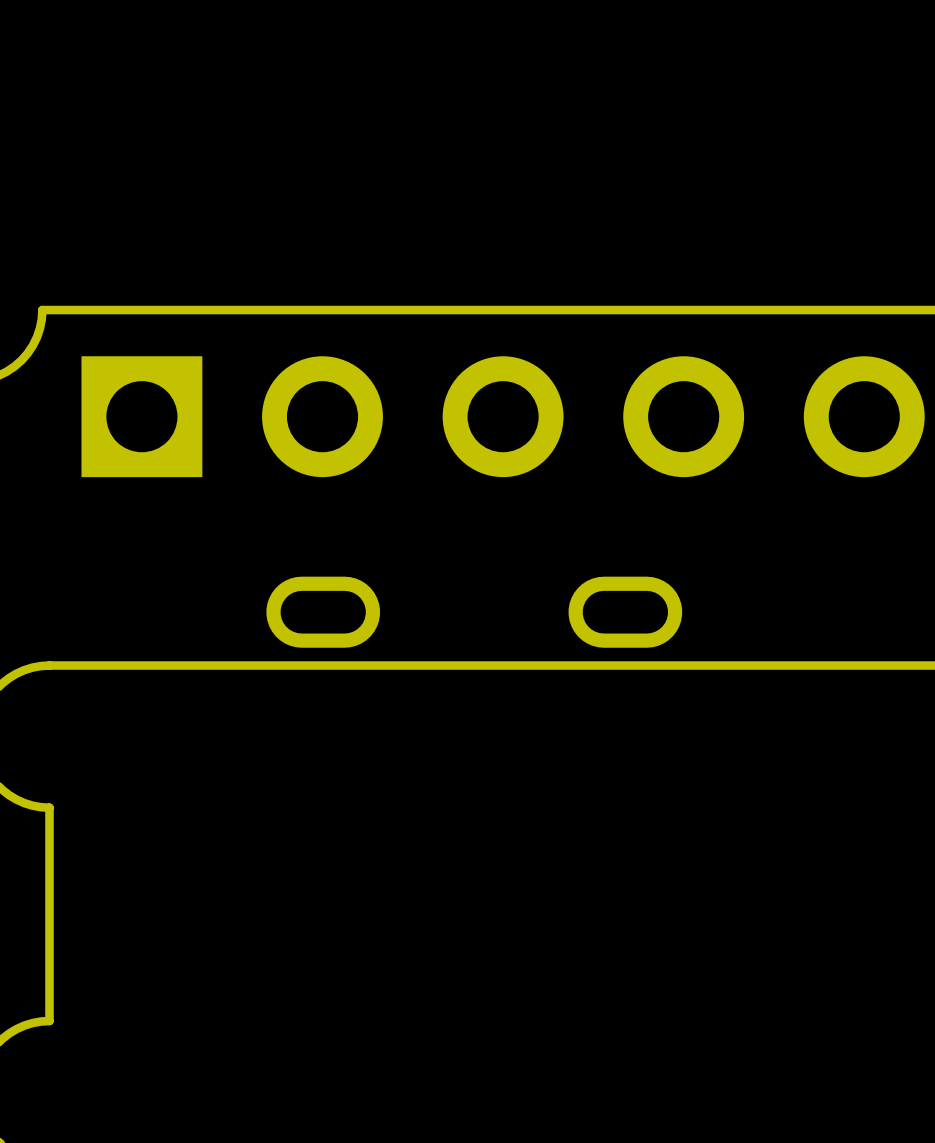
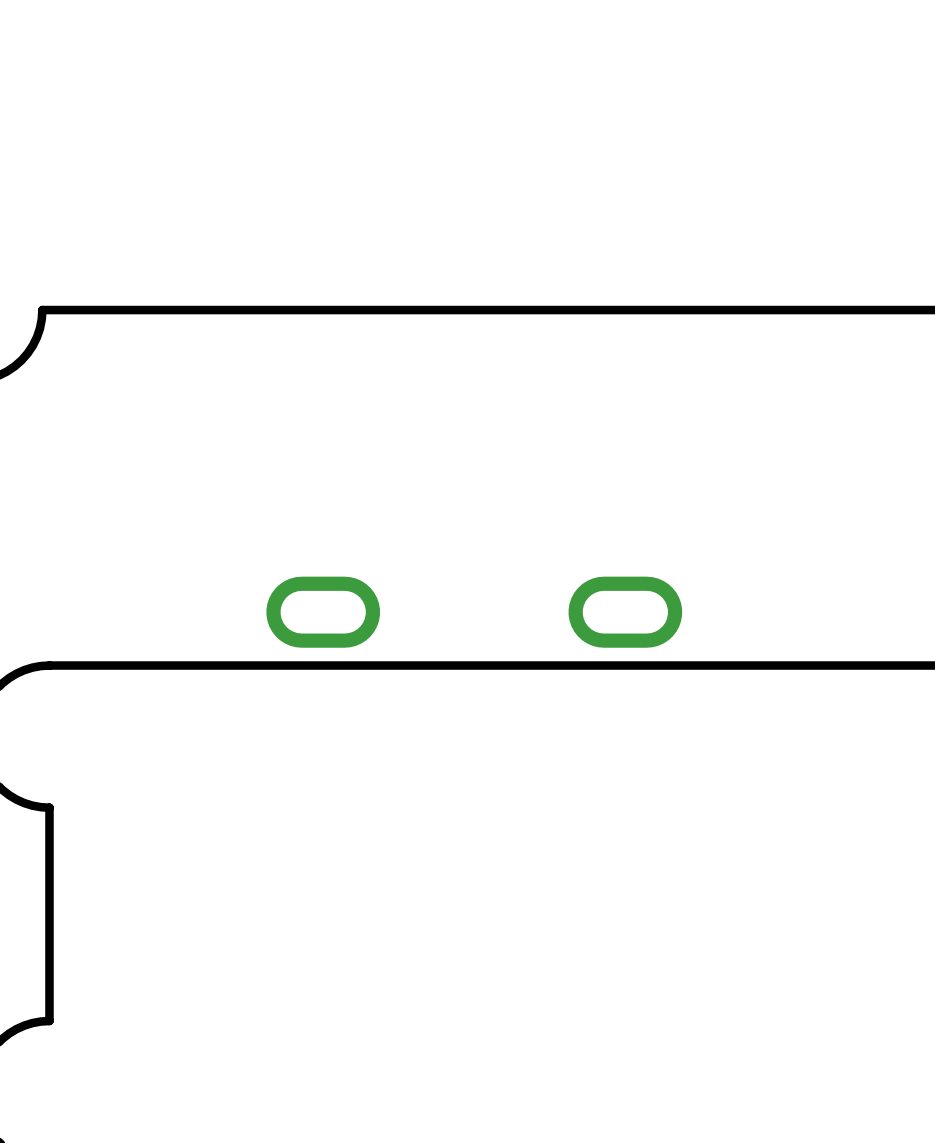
part: (503, 416) -> none

